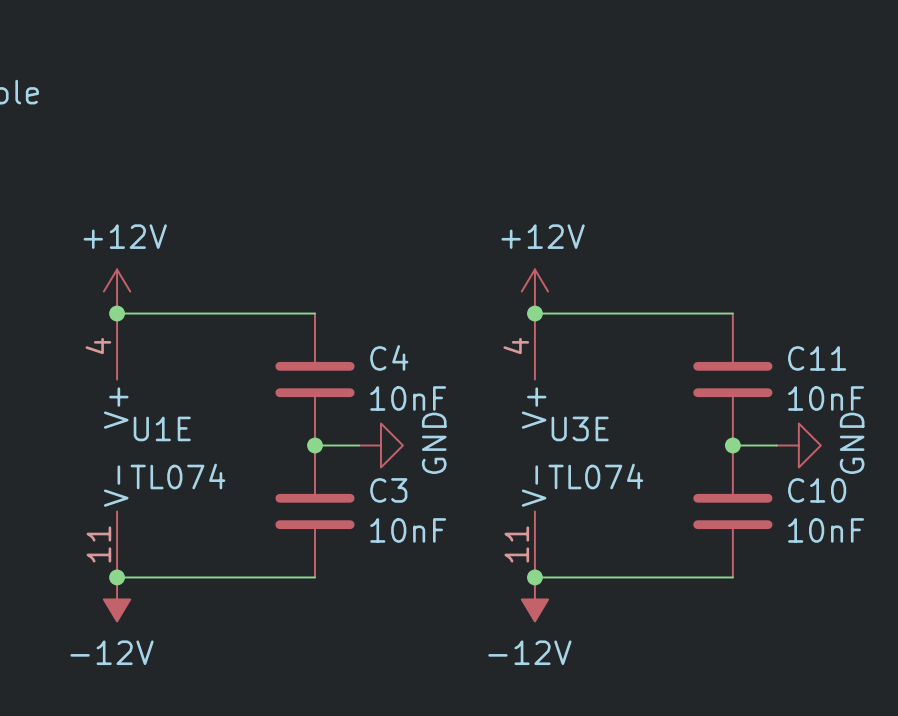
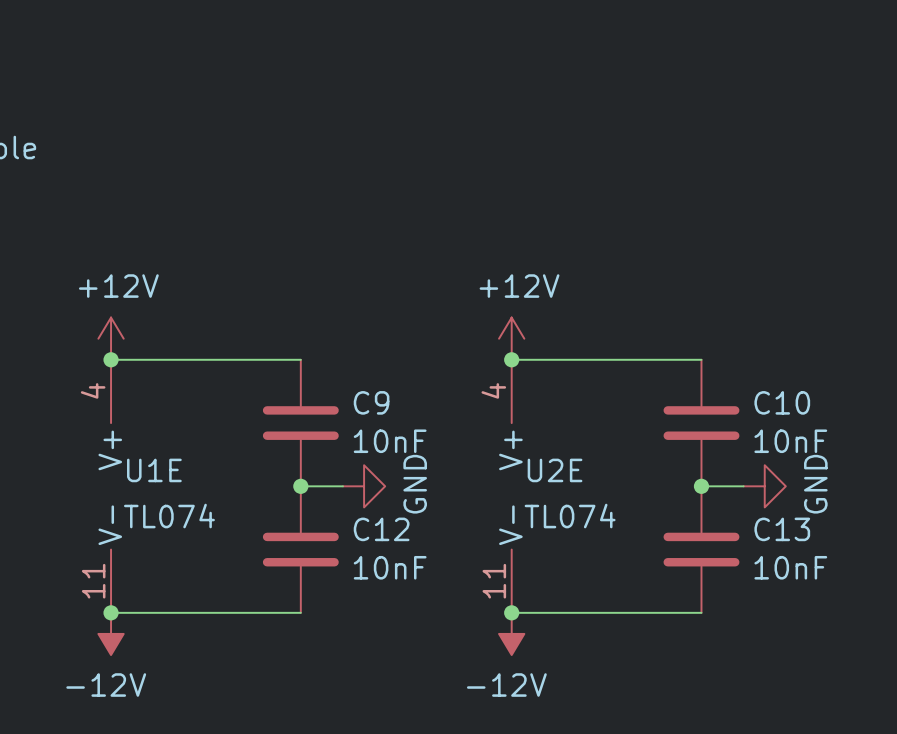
C4 name: C4 (389, 357) -> C9 (371, 402)
C11 name: C11 (817, 358) -> C10 (782, 402)
U3E name: U3E (580, 428) -> U2E (555, 470)
C3 name: C3 (388, 490) -> C12 (381, 529)
C10 name: C10 (817, 490) -> C13 (782, 529)

